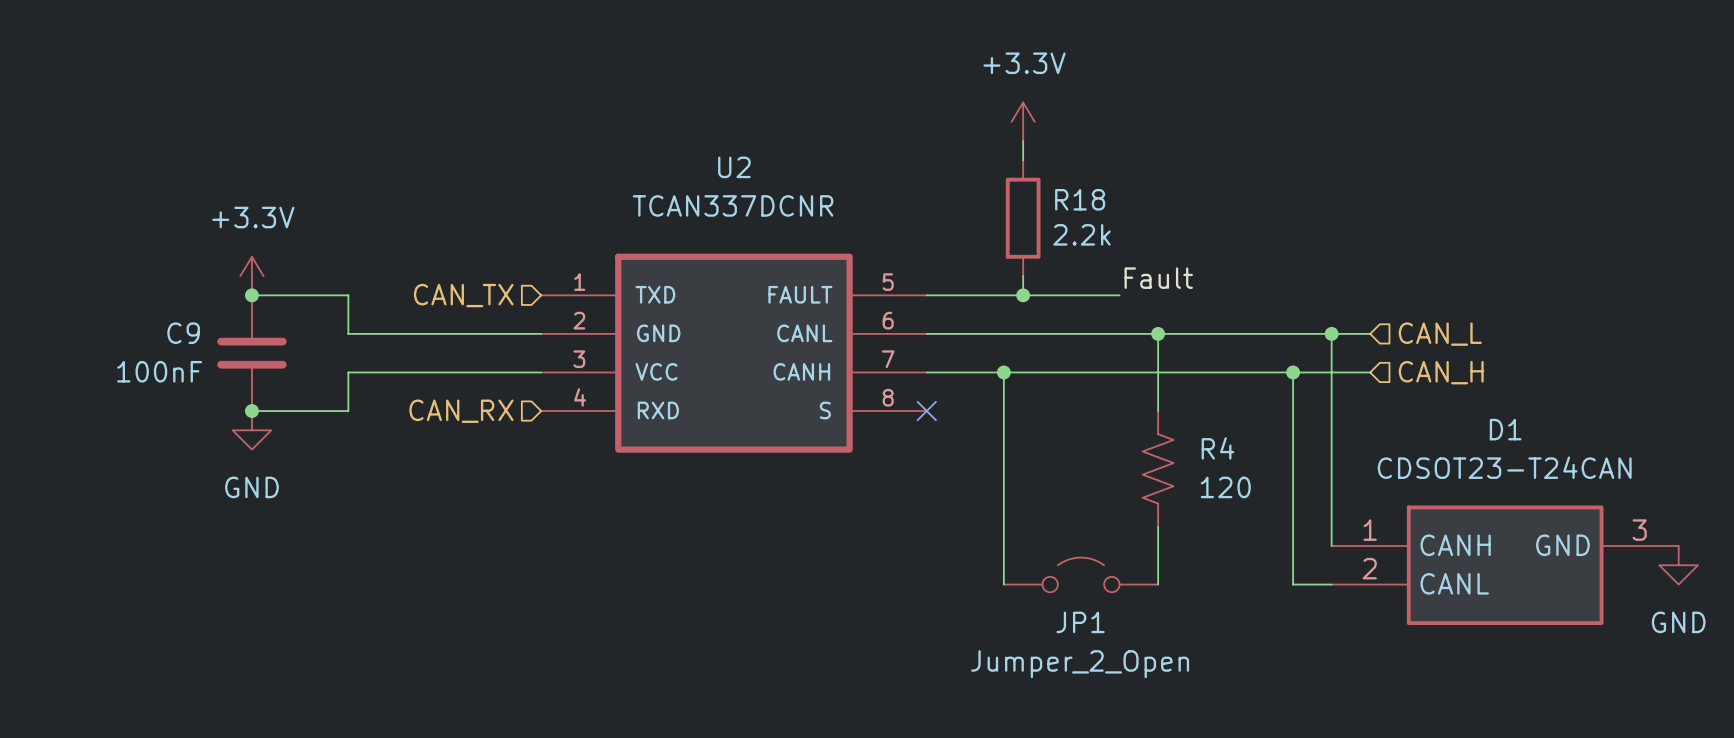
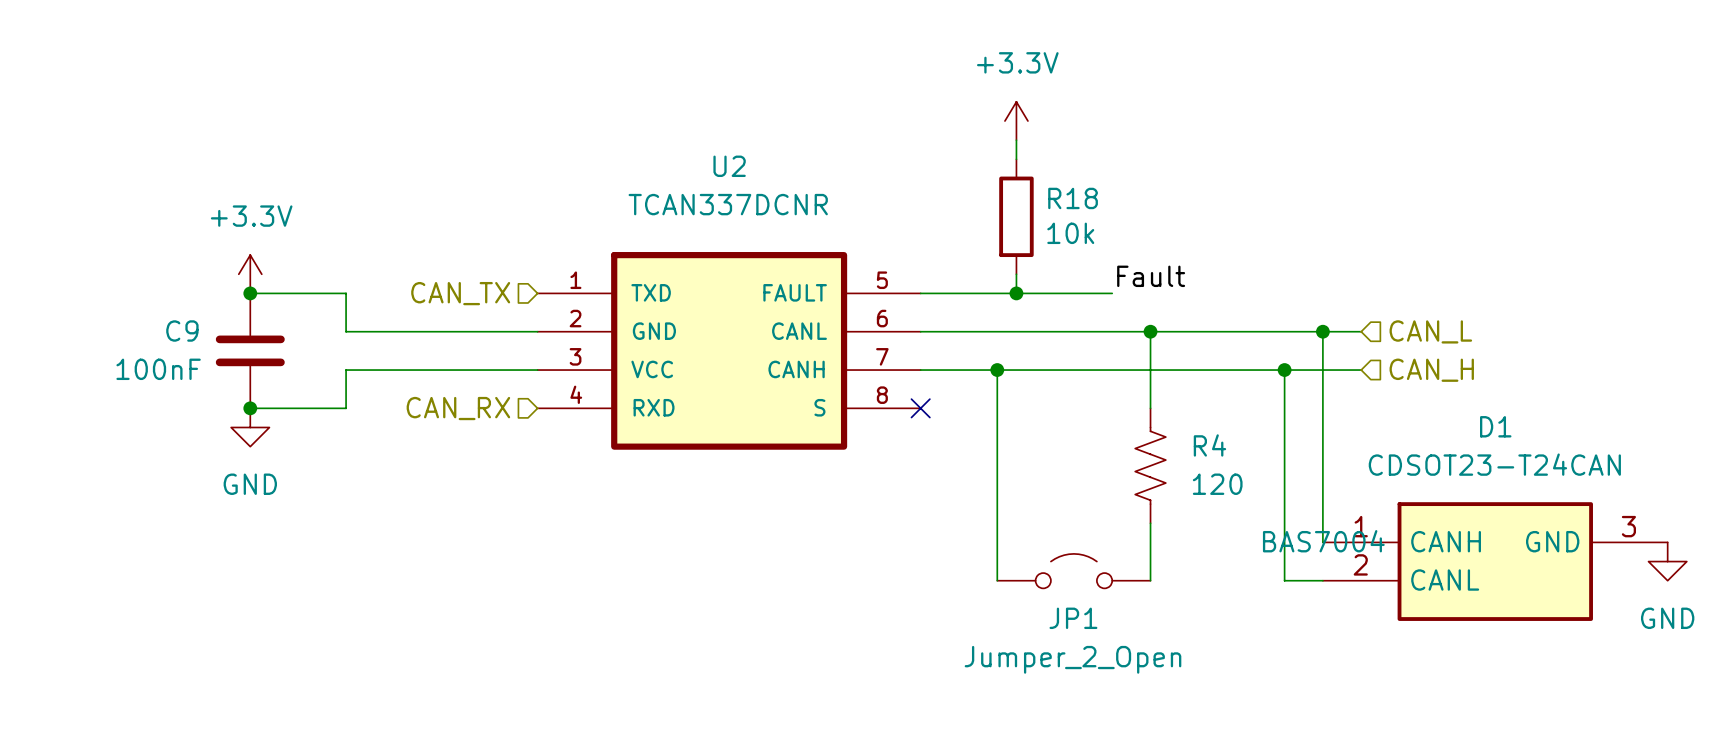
R18 value: 2.2k (1081, 234) -> 10k (1070, 233)
D1 text: none -> BAS7004 (1323, 541)

